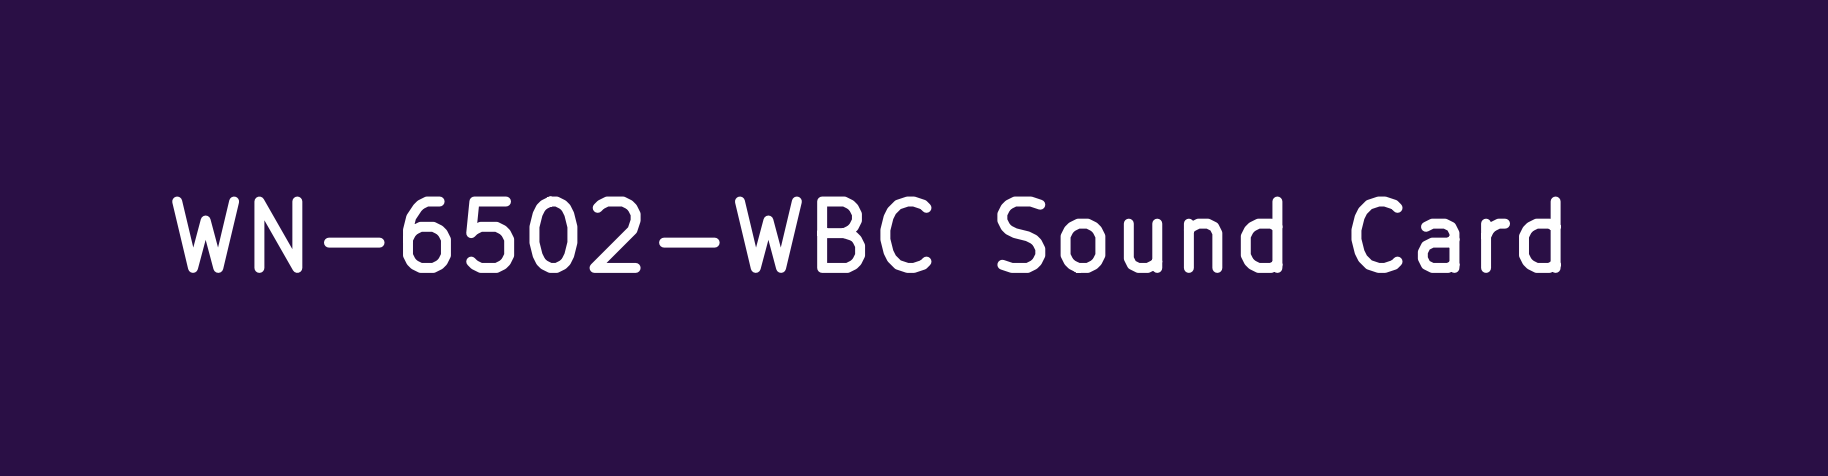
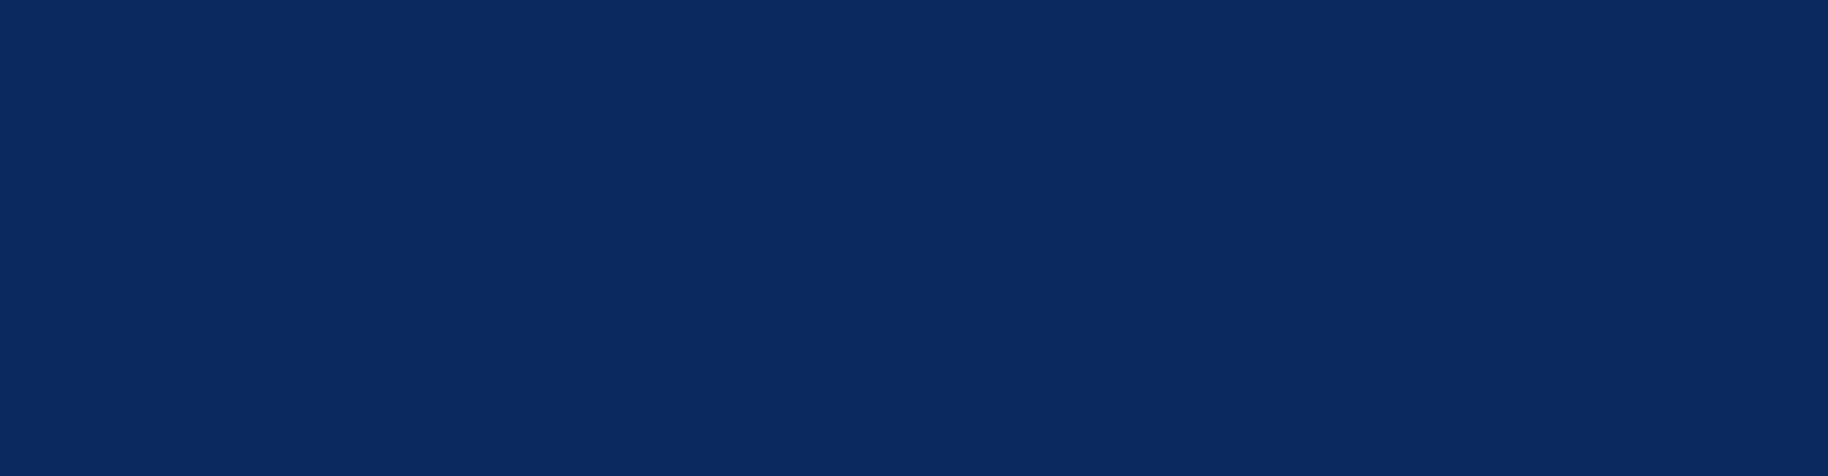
text: WN-6502-WBC Sound Card (866, 234) -> none

